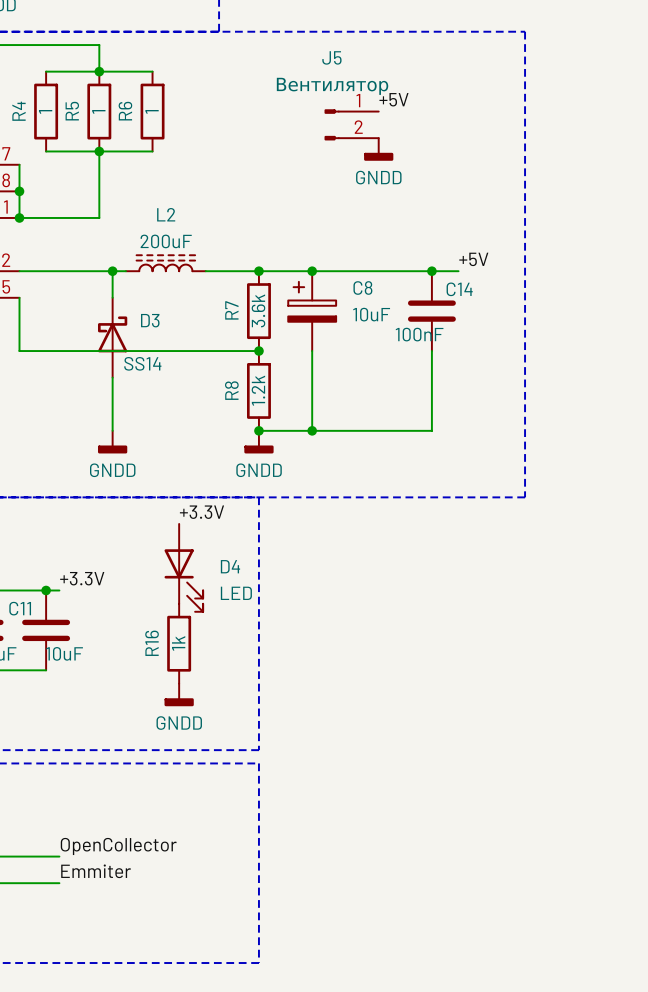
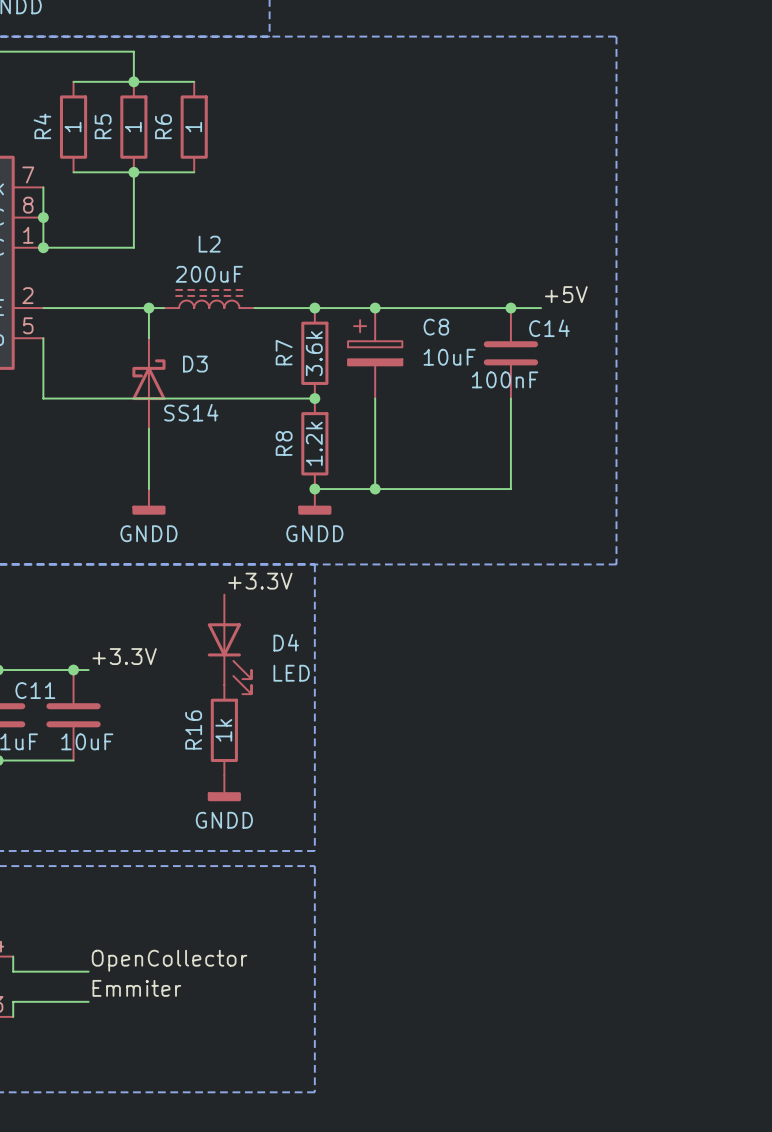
label: +5V (393, 99) -> none
J5: Вентилятор (351, 124) -> none
power symbol: GNDD (378, 149) -> none

